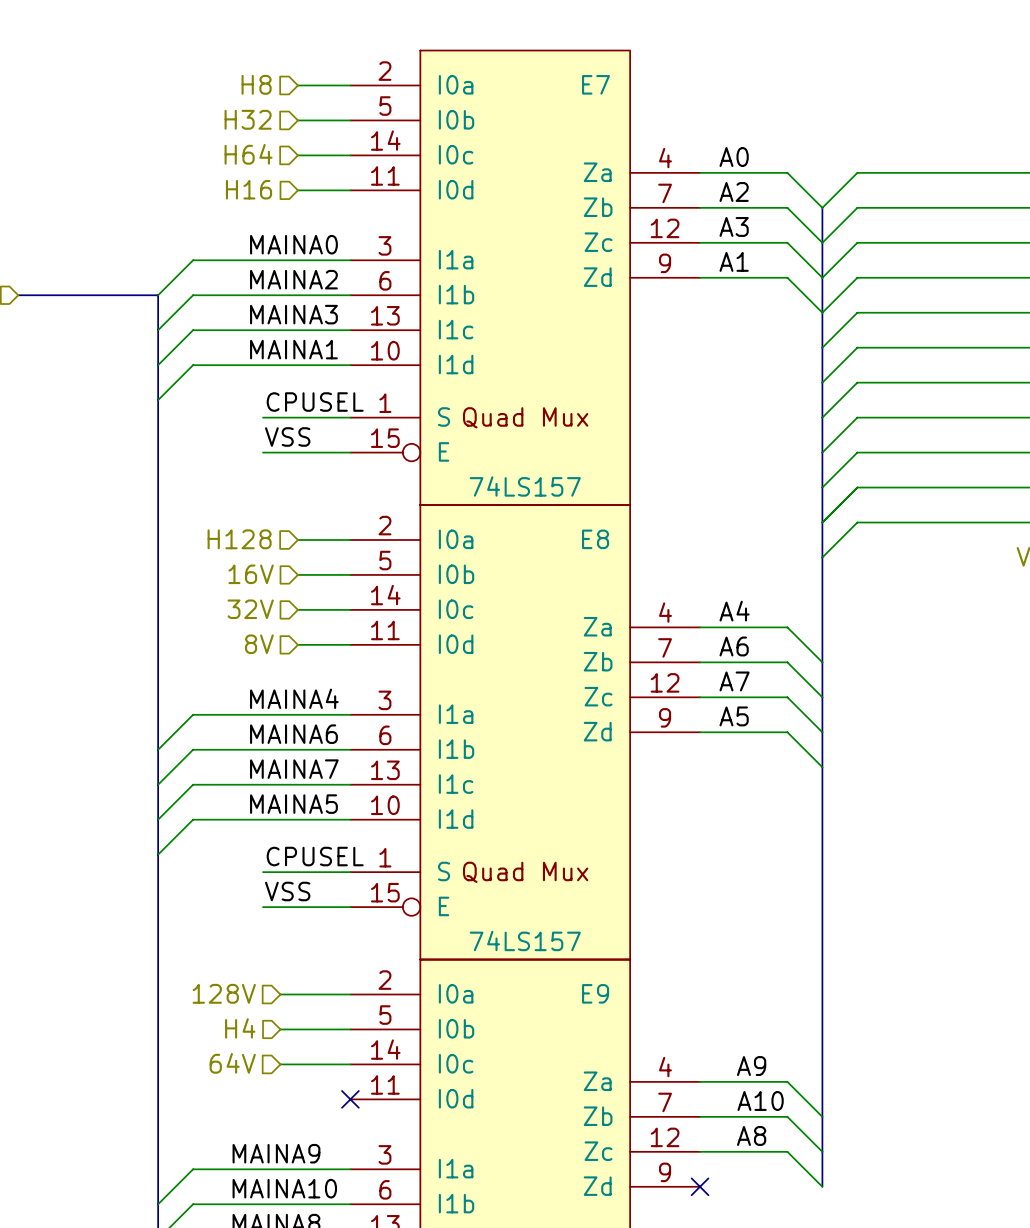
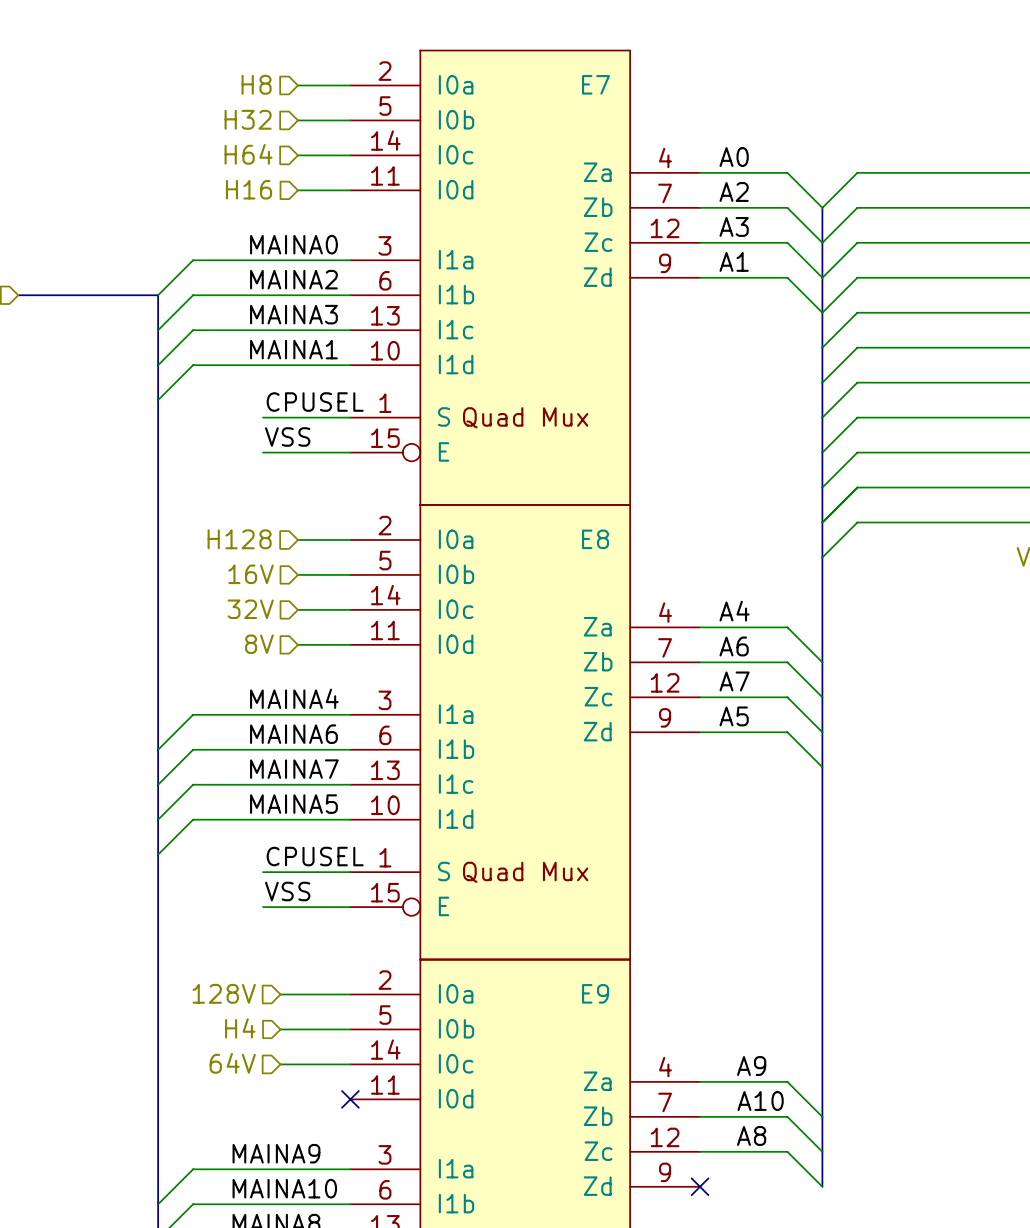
E7 value: 74LS157 (525, 486) -> none
E8 value: 74LS157 (525, 940) -> none

